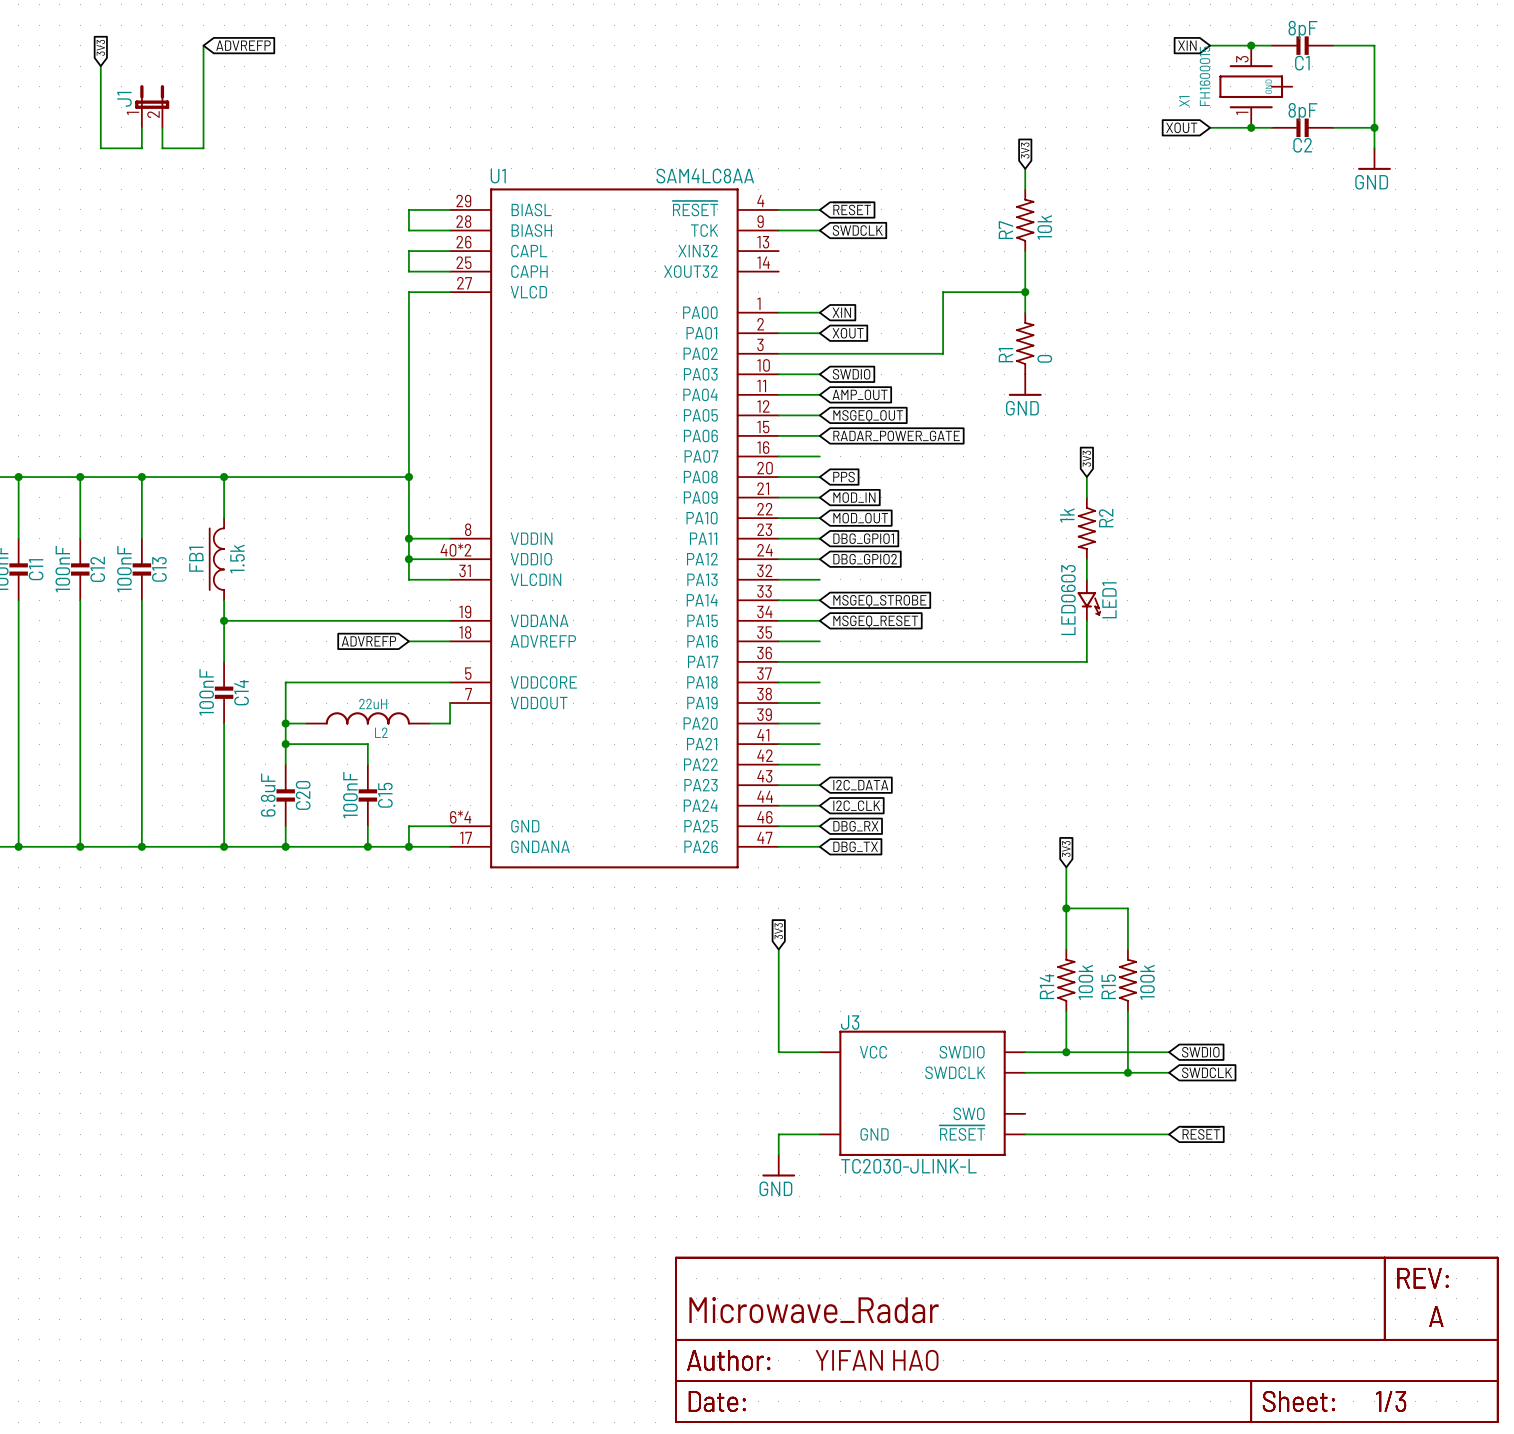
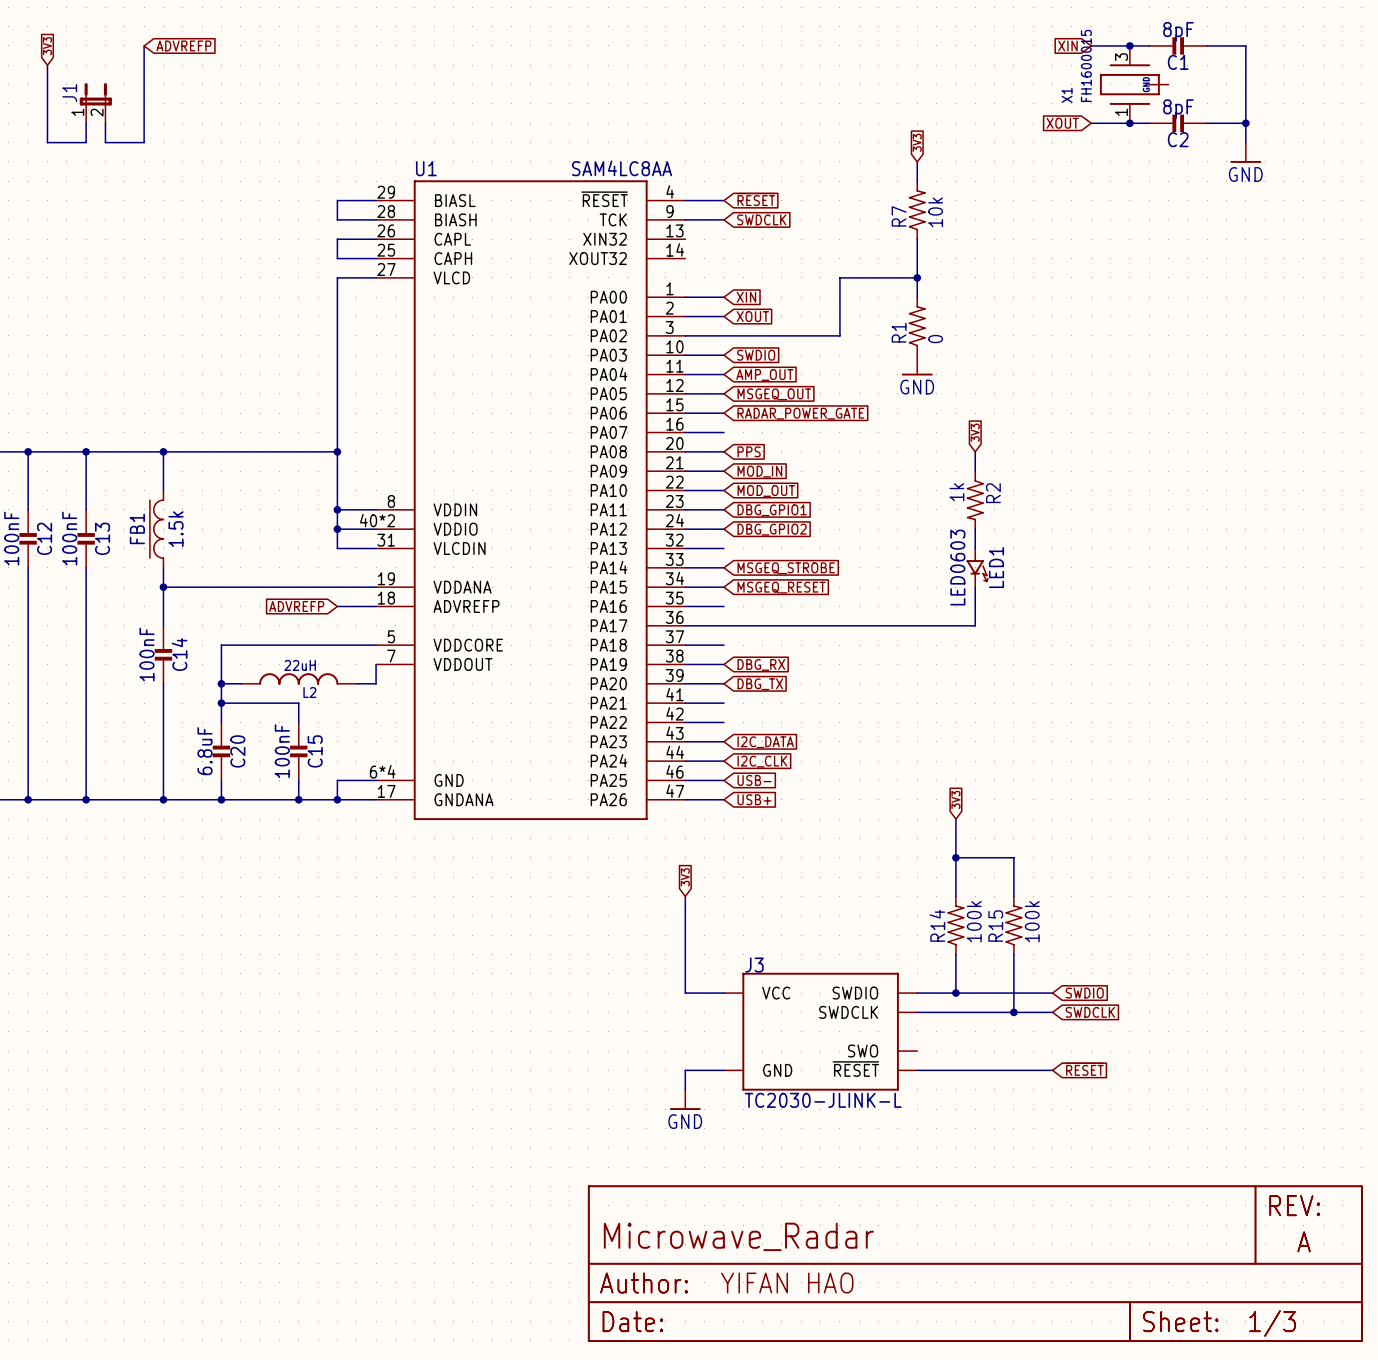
global label: none -> DBG_RX (761, 664)
global label: none -> DBG_TX (760, 684)
global label: DBG_RX (855, 826) -> USB- (754, 780)
global label: DBG_TX (855, 846) -> USB+ (754, 799)

